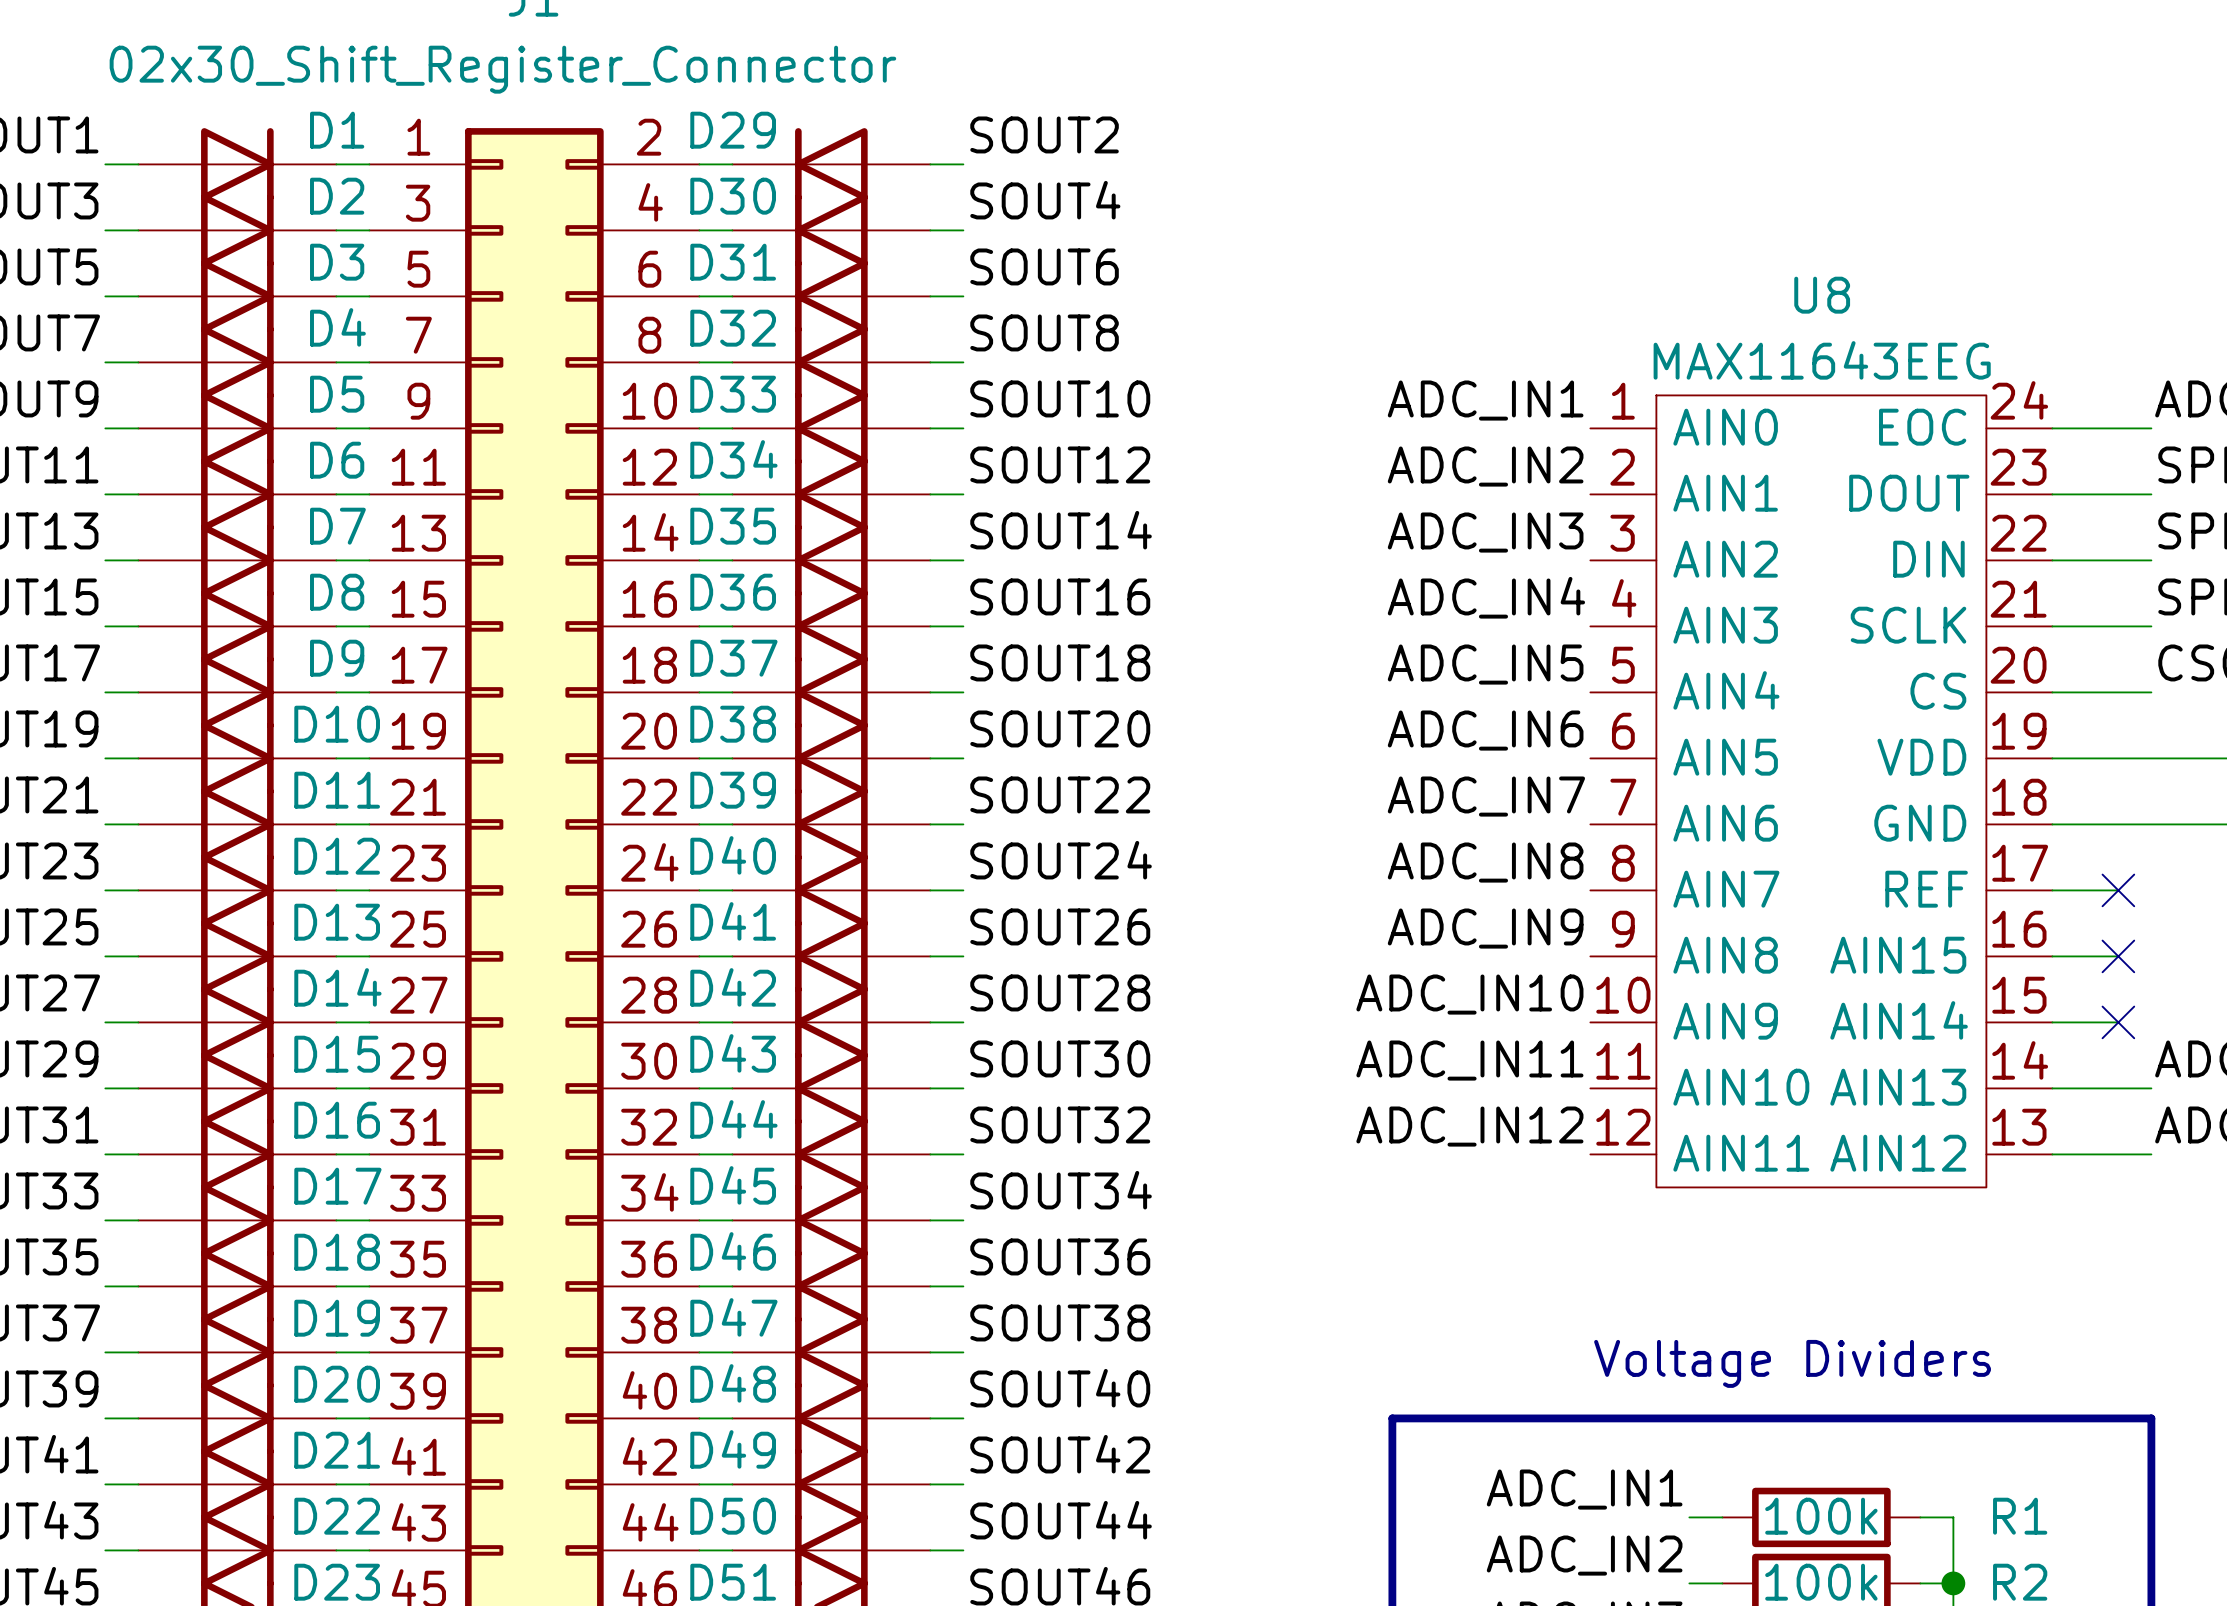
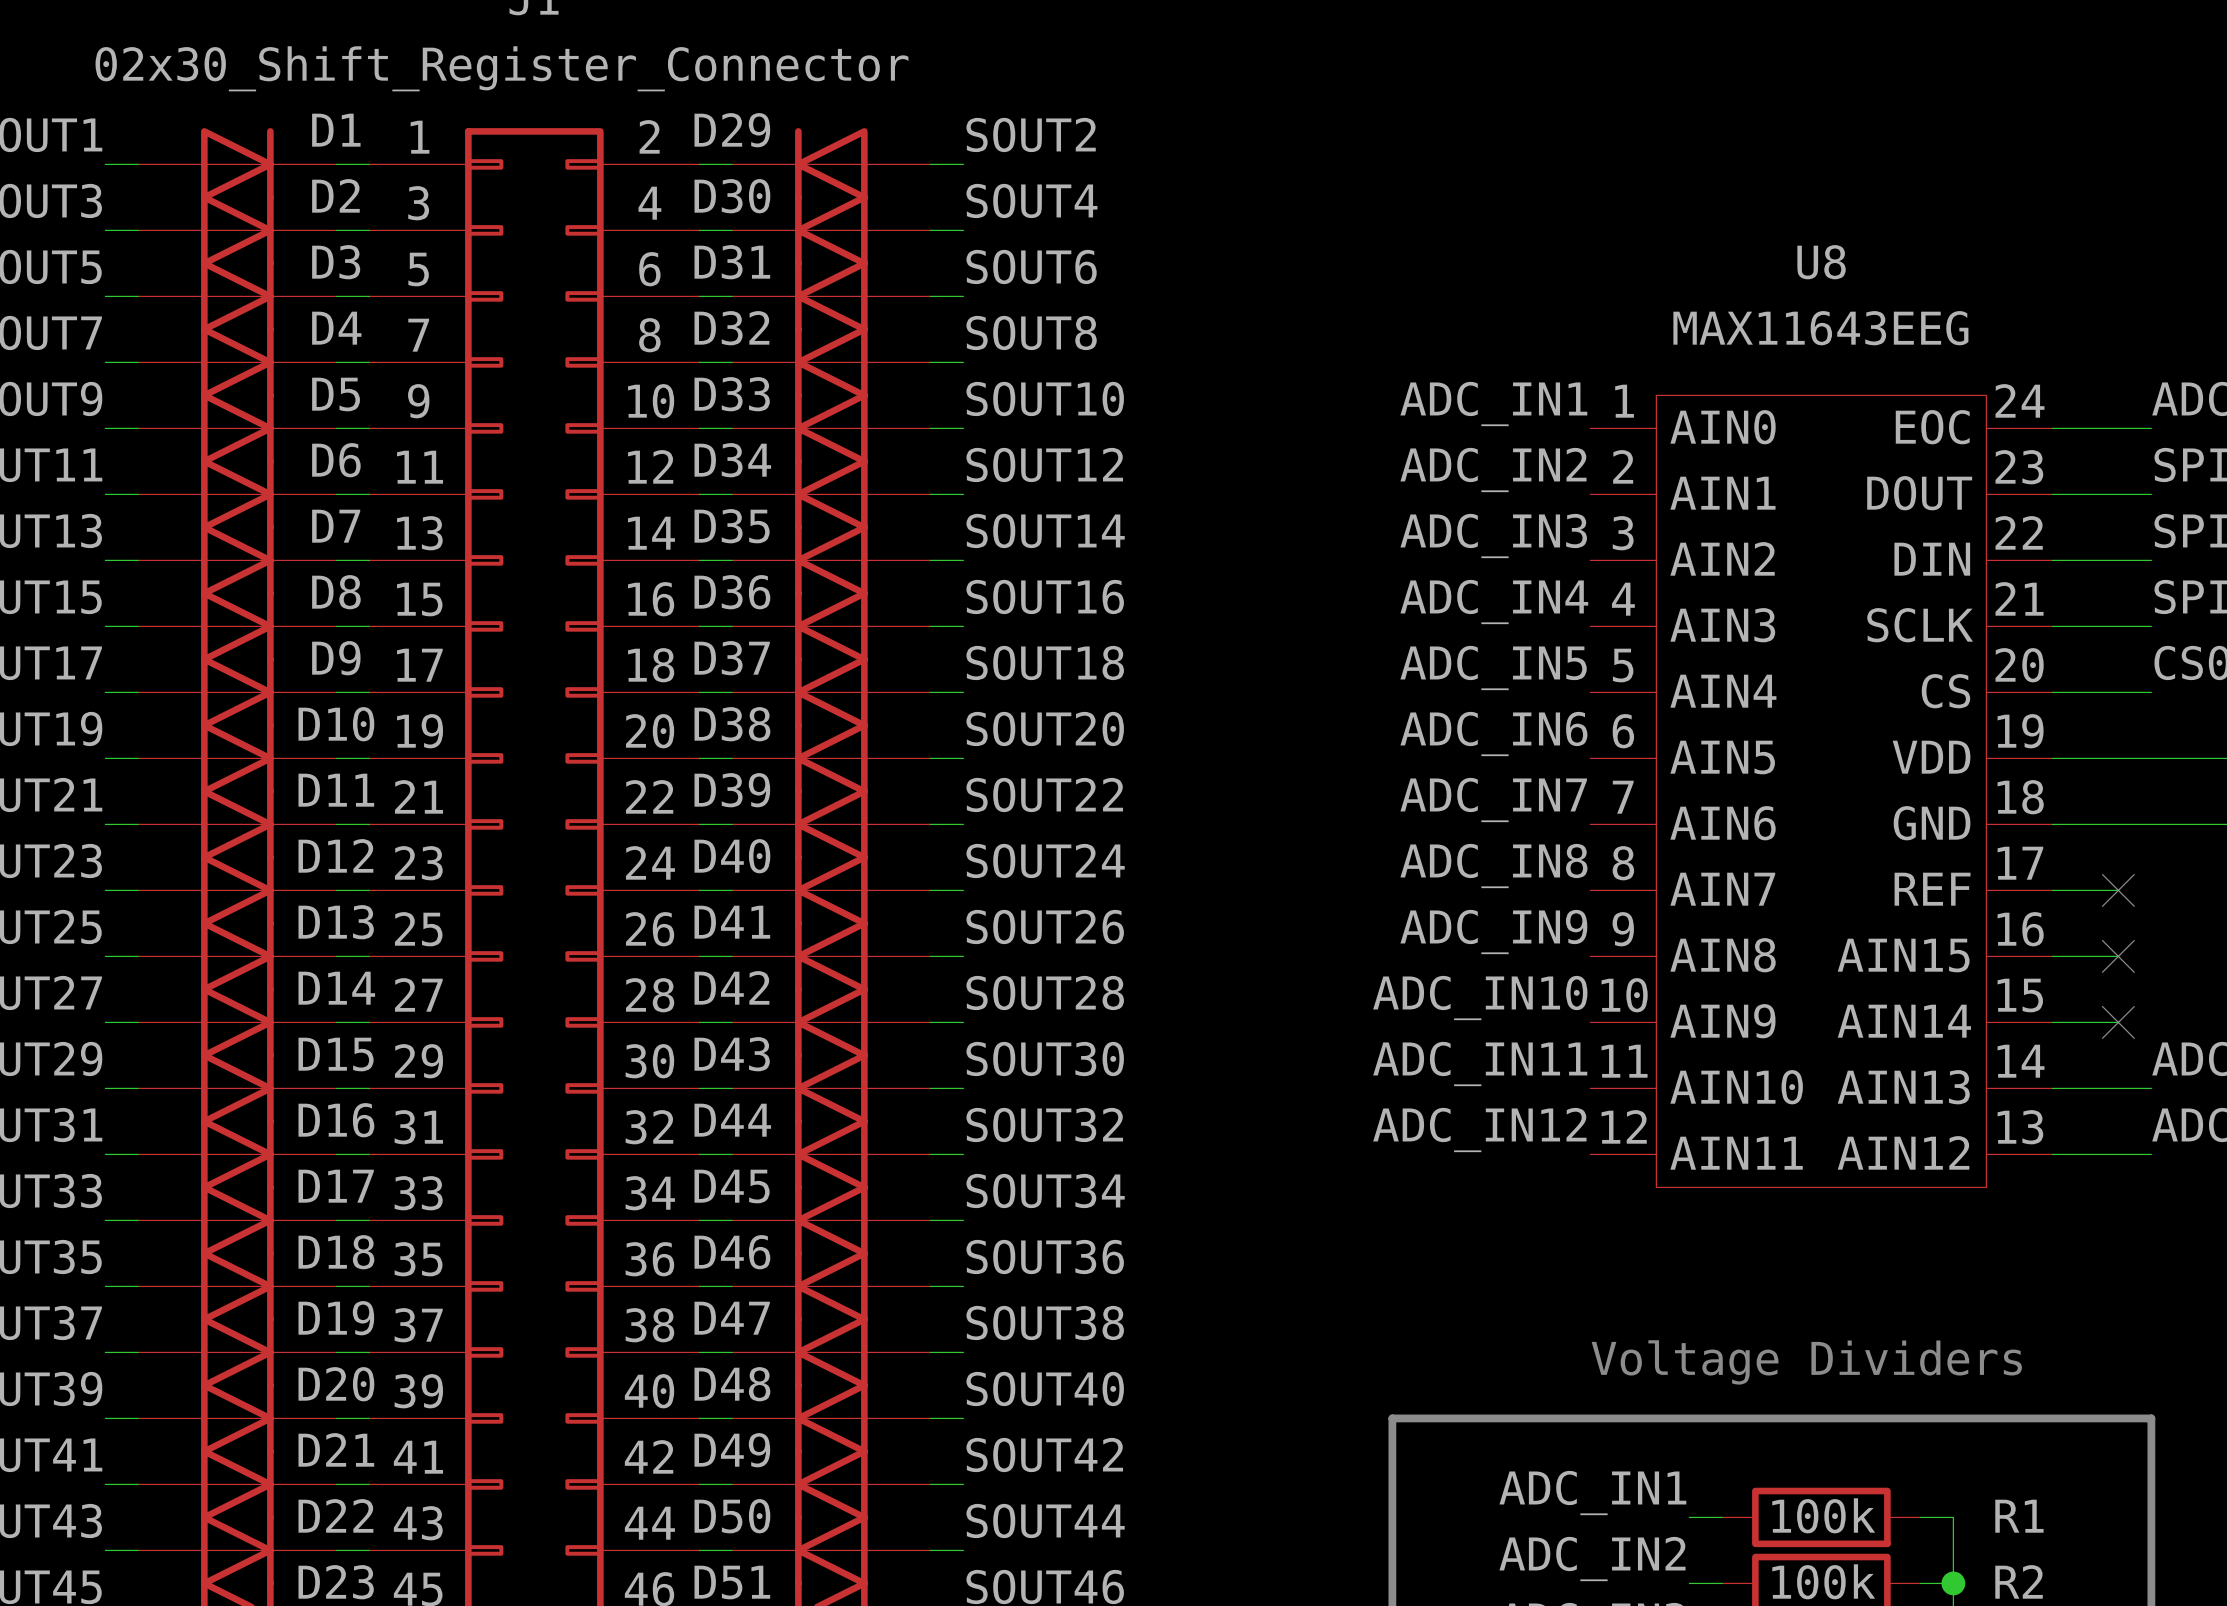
U8 name position: U8 (1822, 295) -> U8 (1821, 262)
U8 value position: MAX11643EEG (1822, 360) -> MAX11643EEG (1820, 328)

